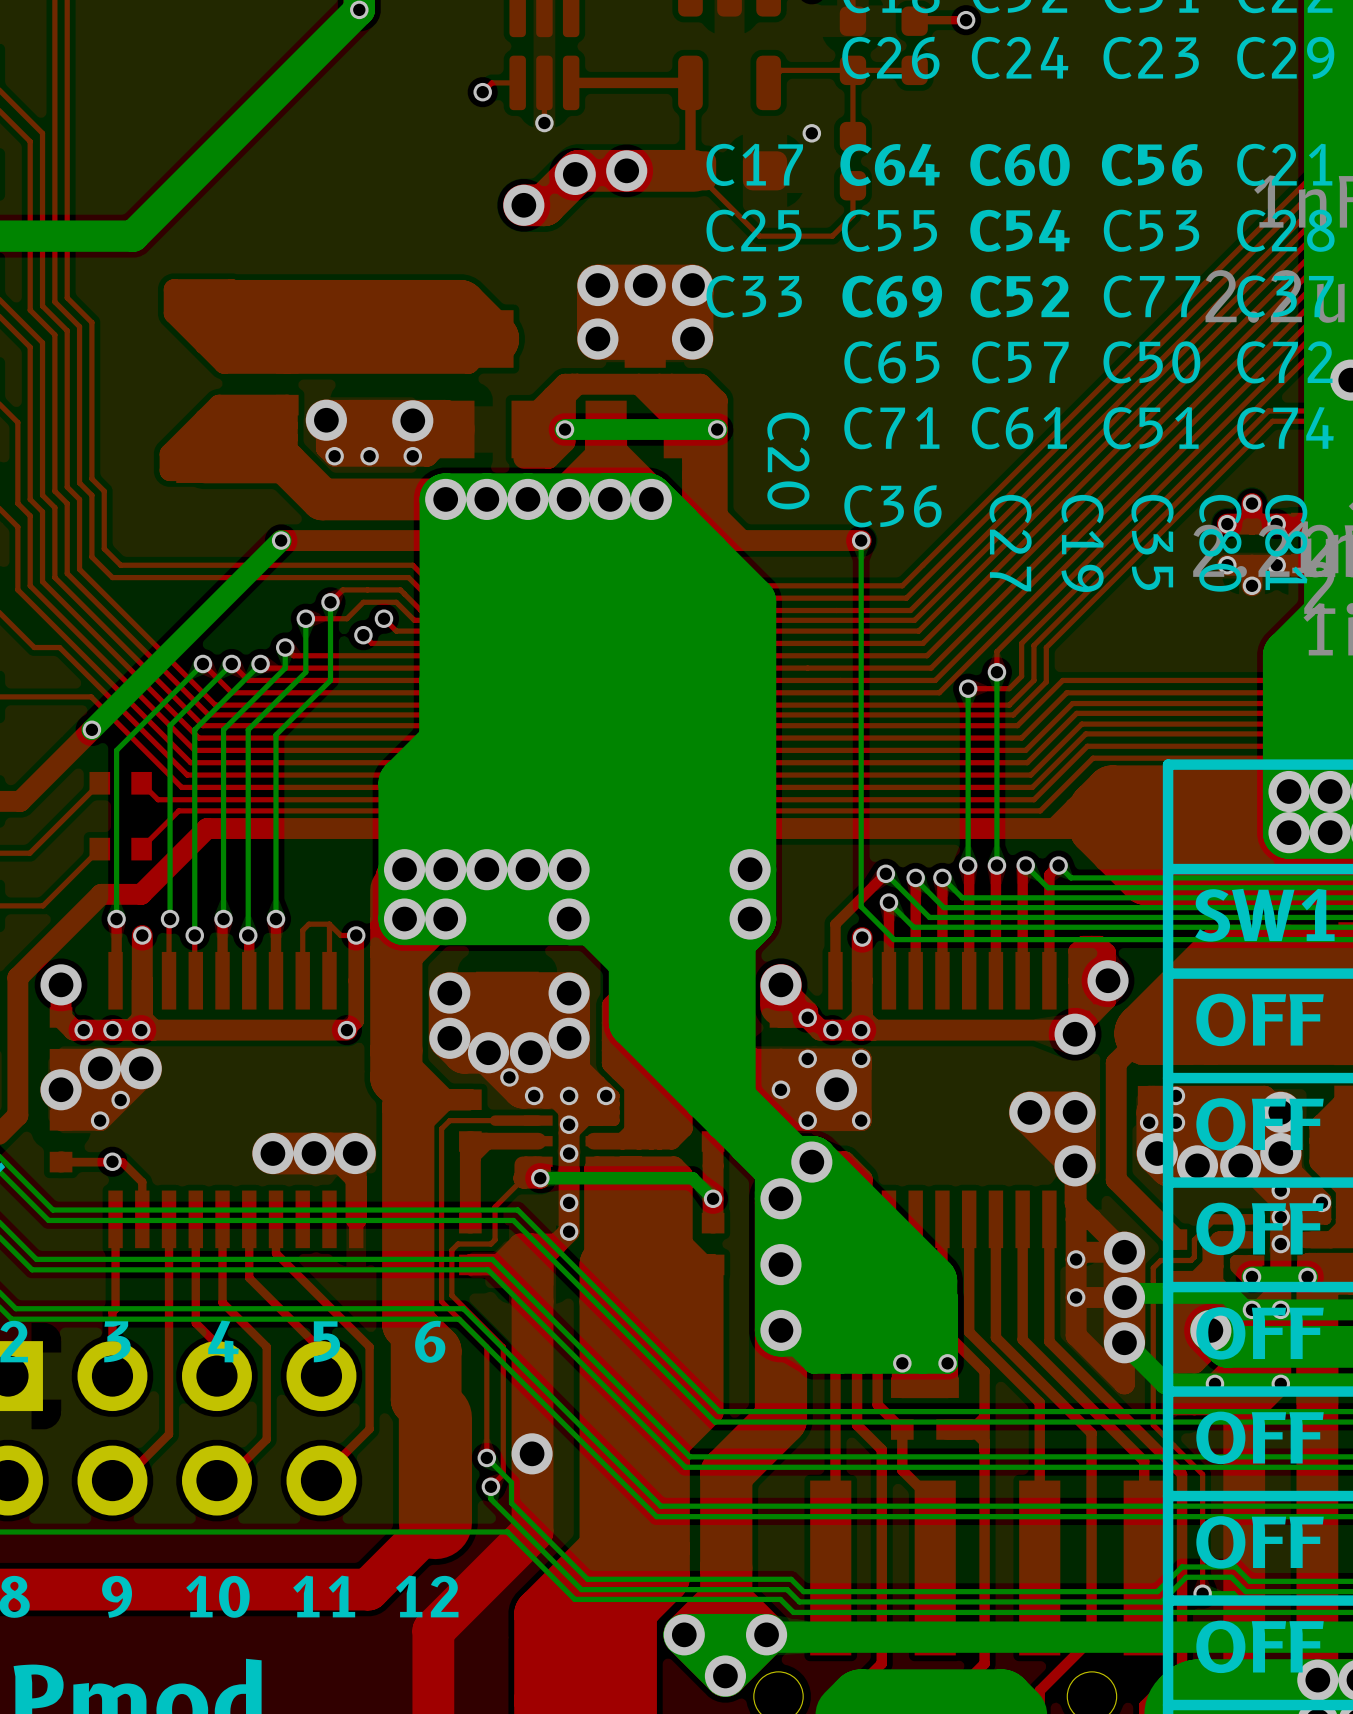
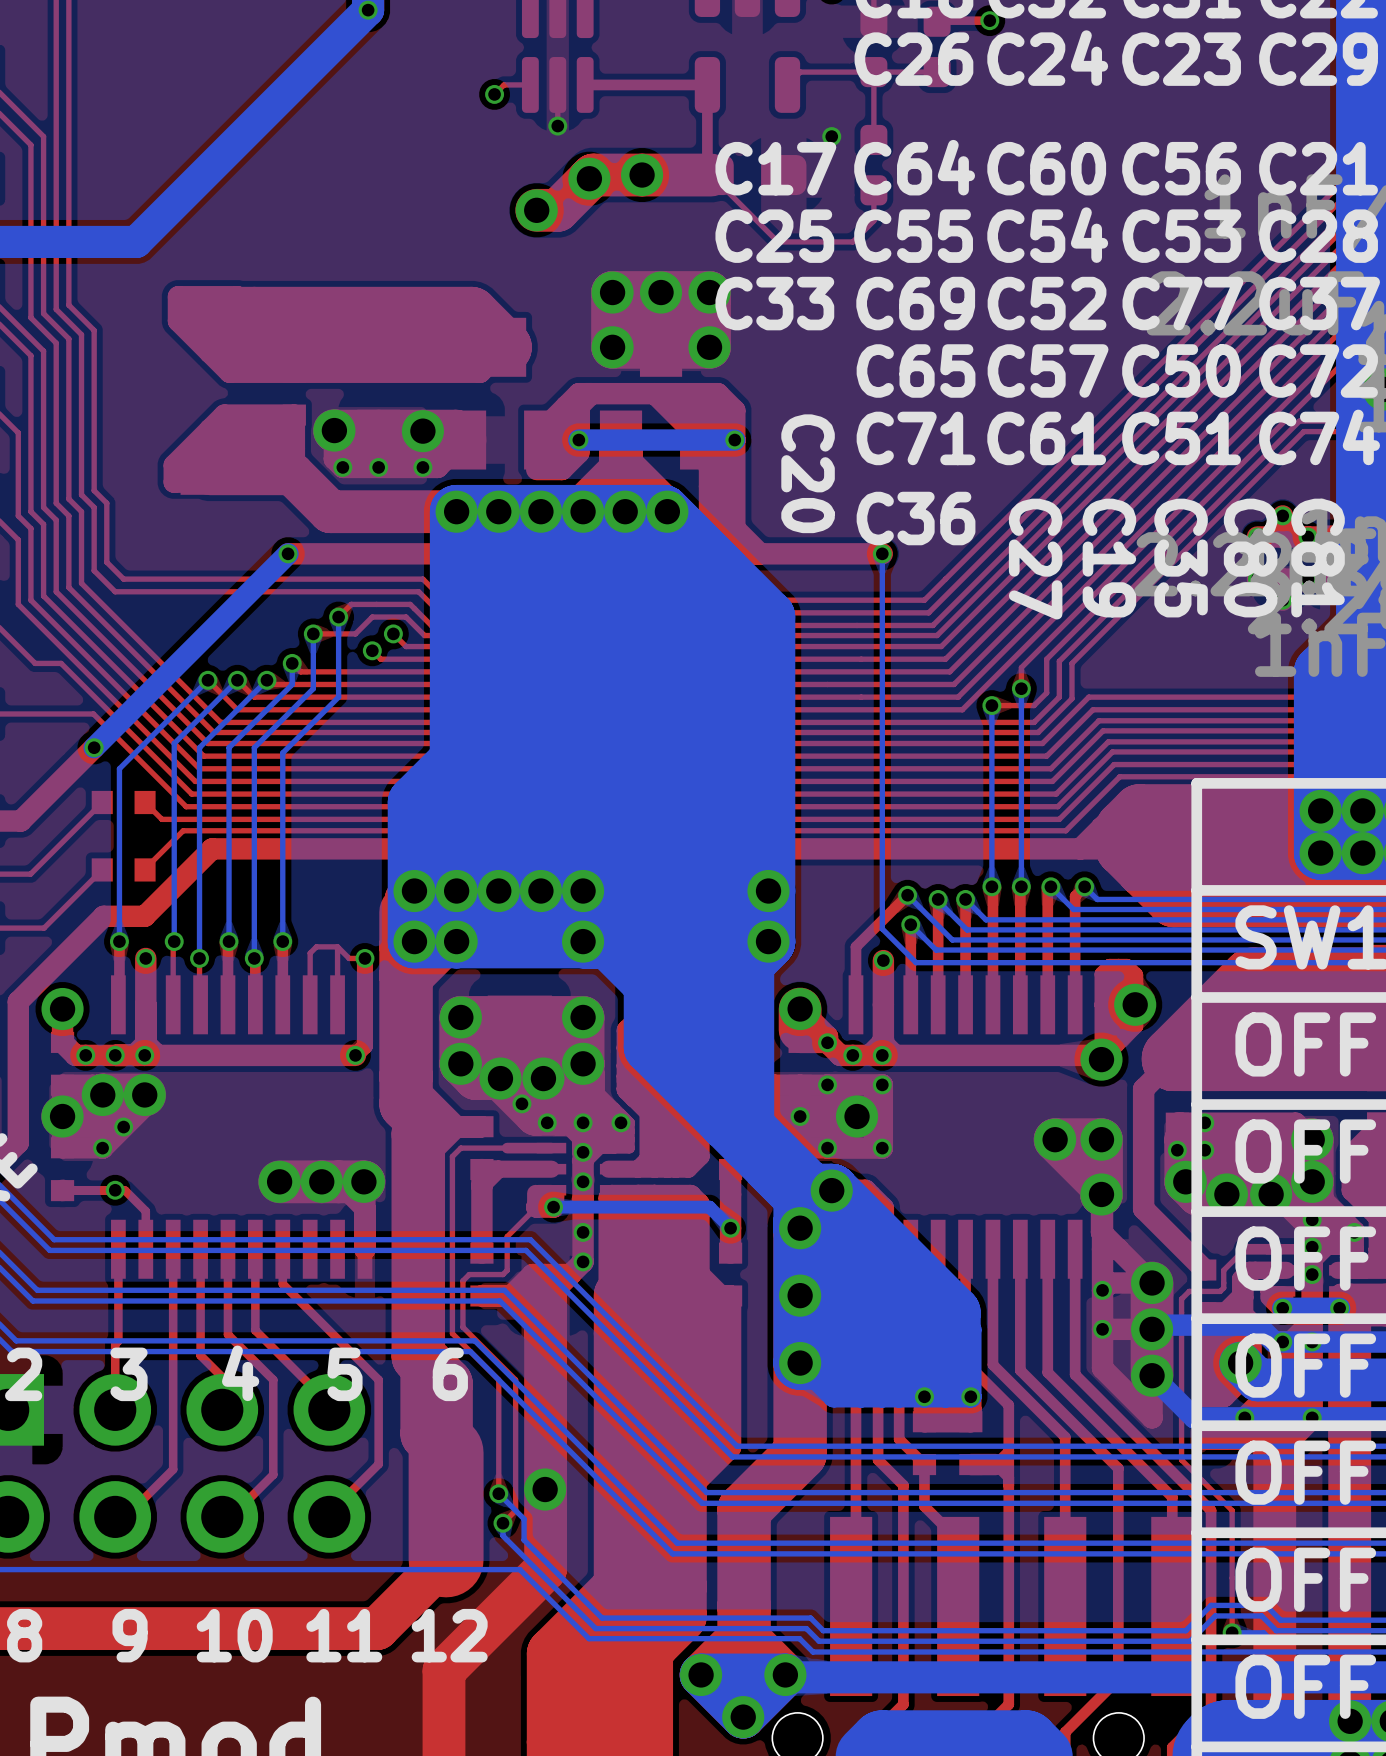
top track: (249, 1277) (321, 1350) (321, 1370) -> (255, 1309) (255, 1330) (329, 1404)

